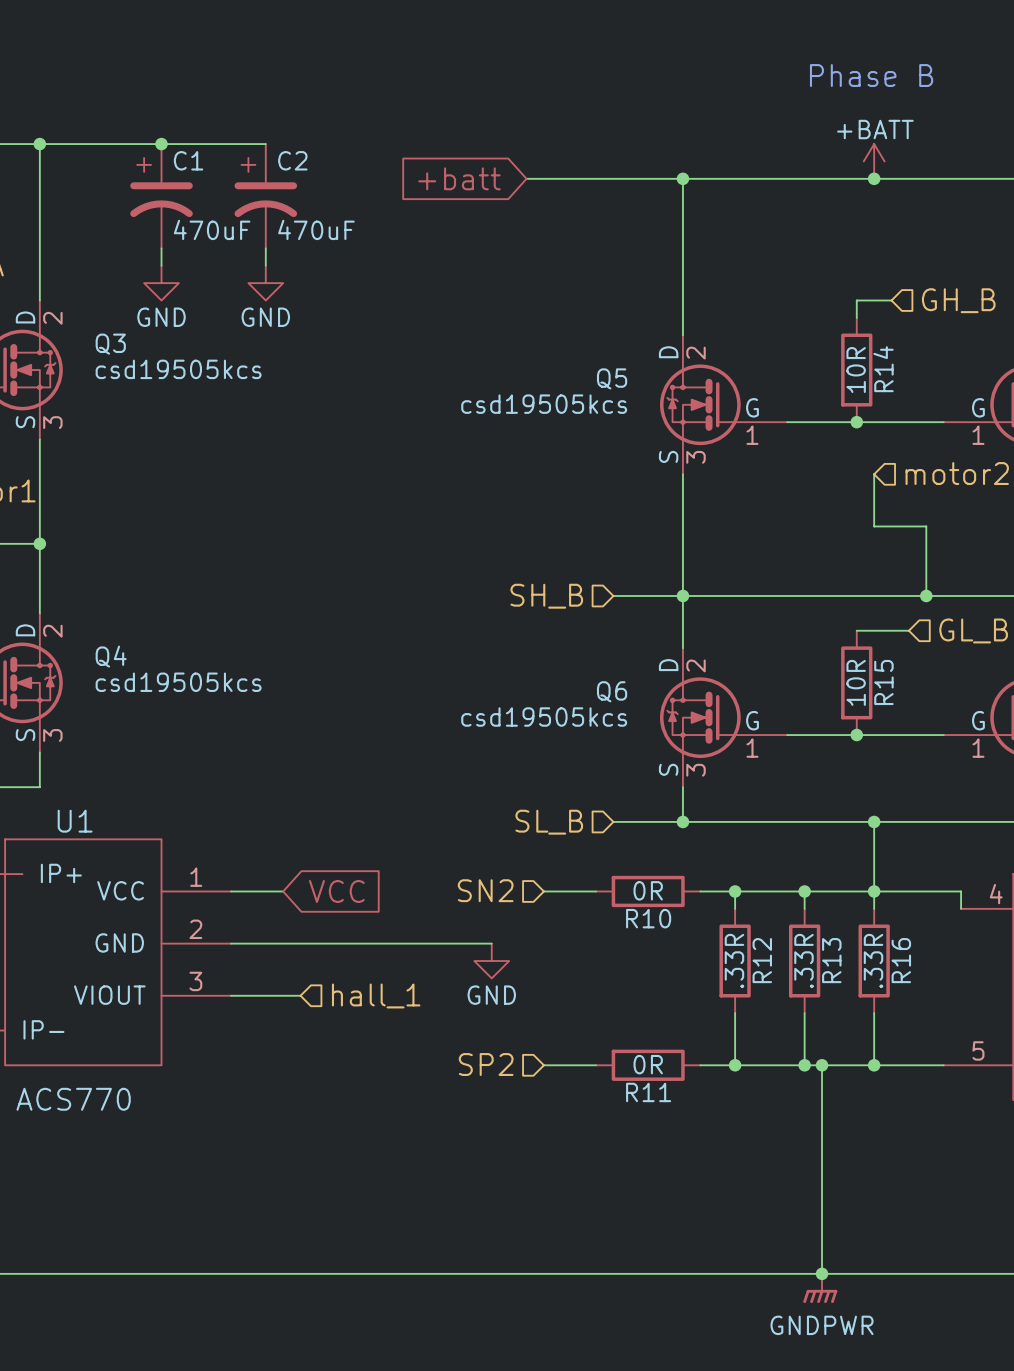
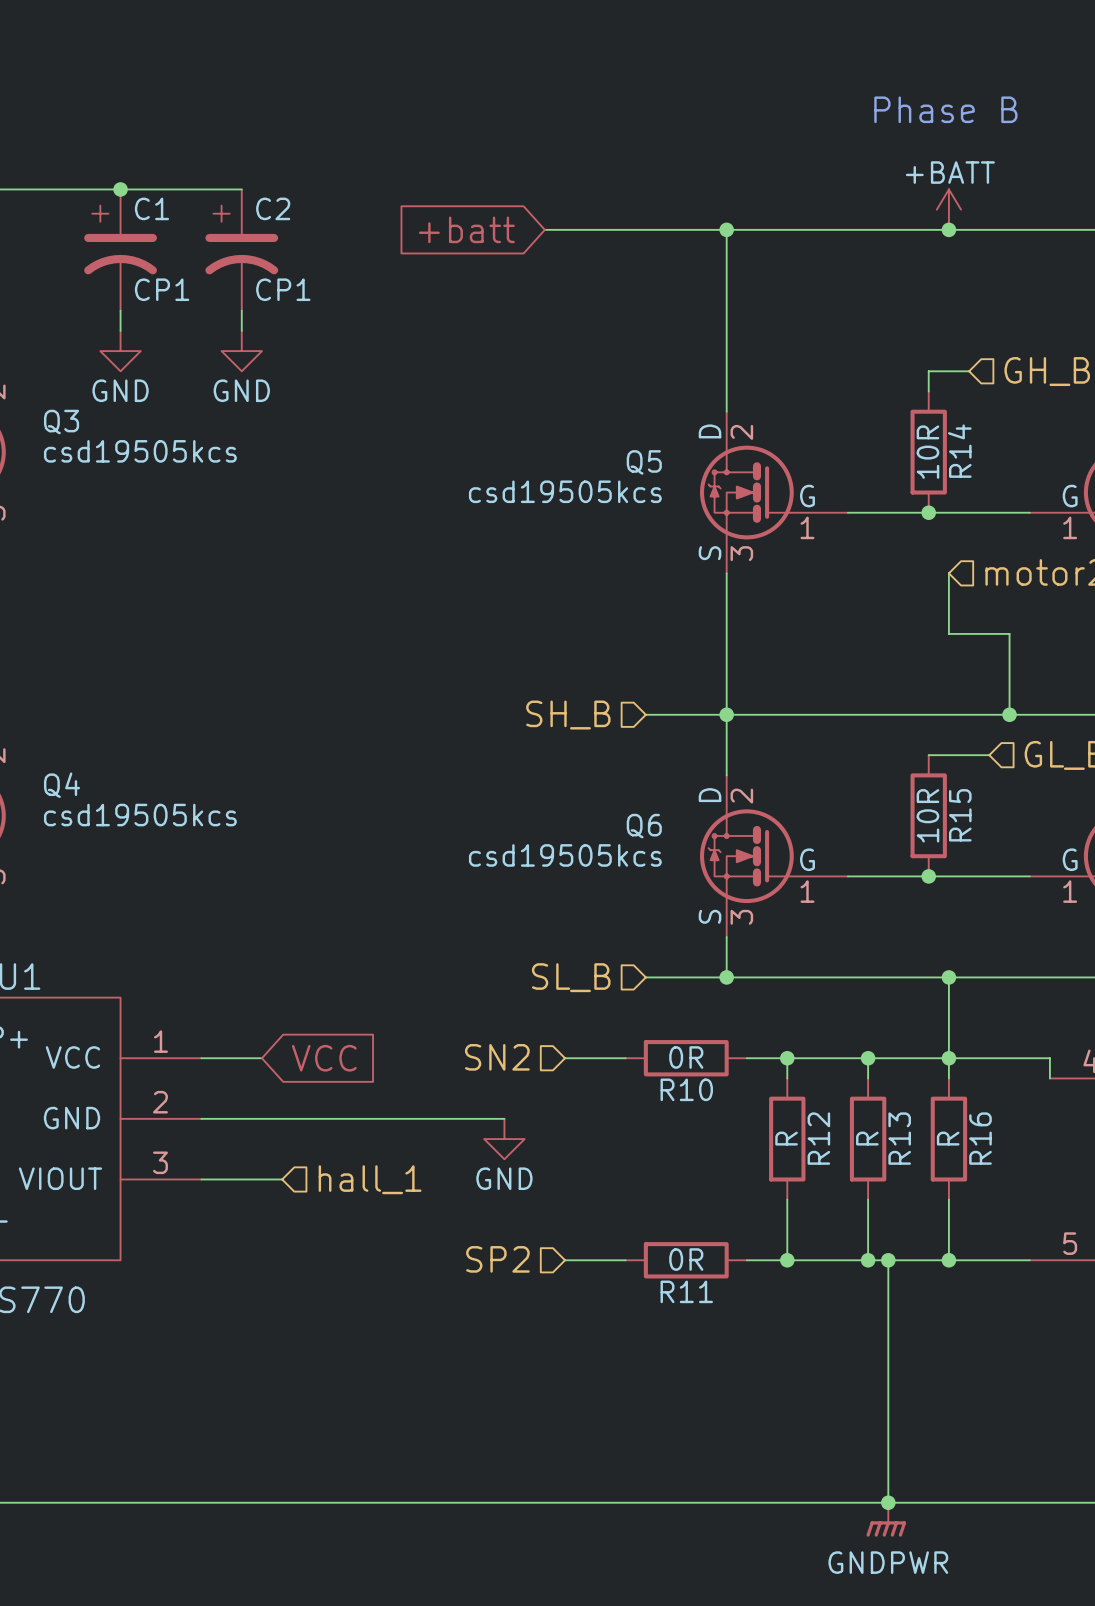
C1 value: 470uF (212, 229) -> CP1 (162, 289)
C2 value: 470uF (316, 229) -> CP1 (283, 289)
R12 value: .33R (734, 961) -> R (786, 1138)
R13 value: .33R (803, 961) -> R (867, 1138)
R16 value: .33R (873, 961) -> R (948, 1138)

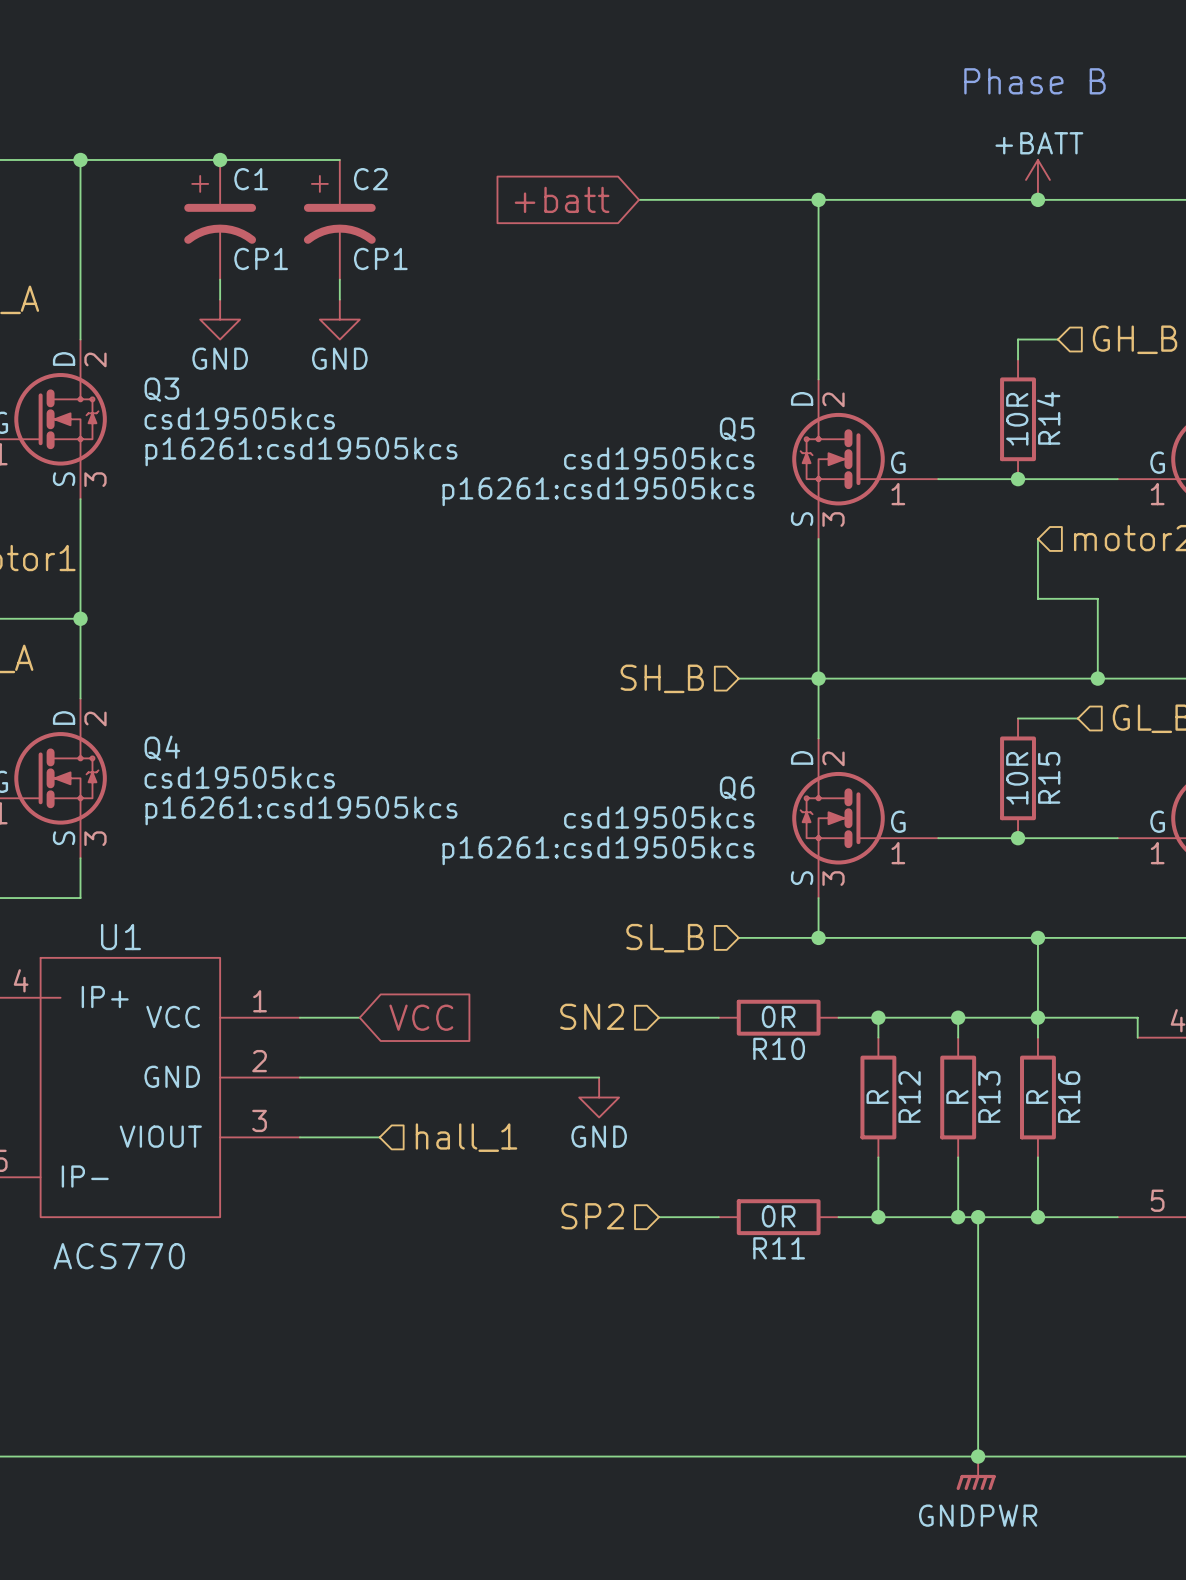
Q3 text: none -> p16261:csd19505kcs (301, 451)
Q5 text: none -> p16261:csd19505kcs (598, 491)
Q4 text: none -> p16261:csd19505kcs (301, 810)
Q6 text: none -> p16261:csd19505kcs (598, 850)

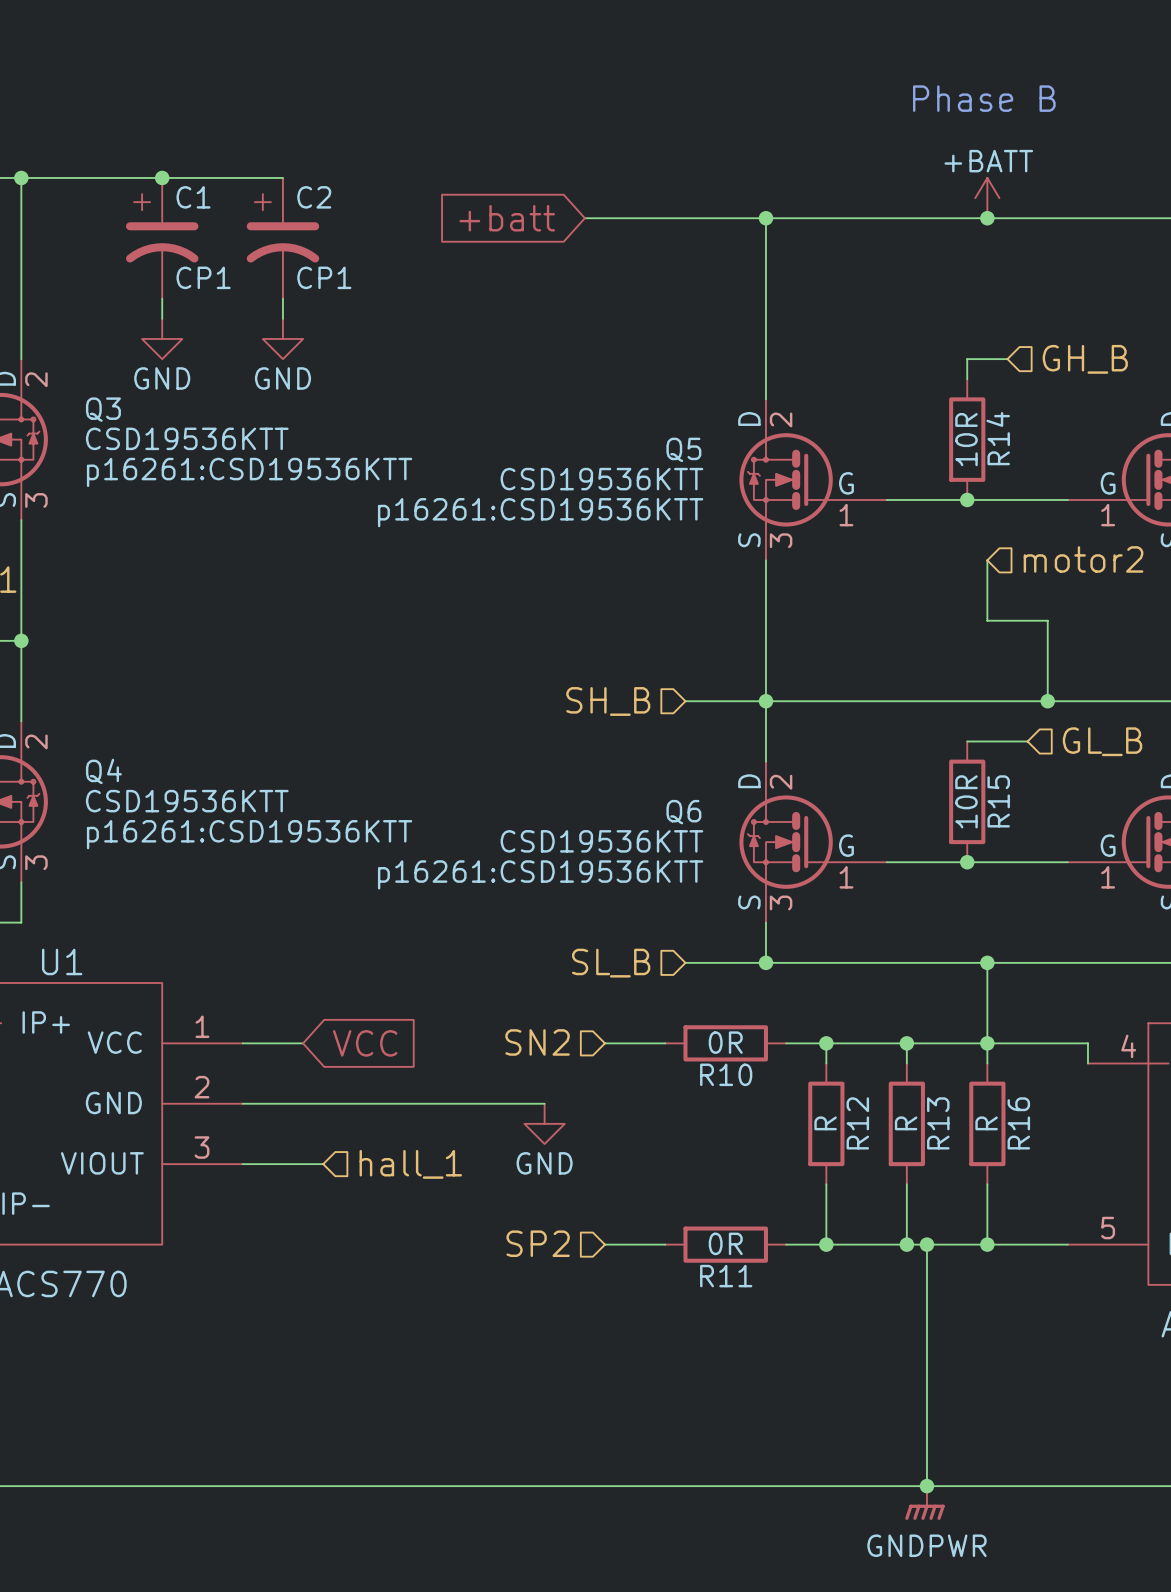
Q3 value: csd19505kcs (239, 418) -> CSD19536KTT (187, 438)
Q3 text: p16261:csd19505kcs (301, 451) -> p16261:CSD19536KTT (249, 472)
Q5 value: csd19505kcs (659, 458) -> CSD19536KTT (601, 479)
Q5 text: p16261:csd19505kcs (598, 491) -> p16261:CSD19536KTT (540, 512)
Q4 value: csd19505kcs (239, 777) -> CSD19536KTT (187, 801)
Q4 text: p16261:csd19505kcs (301, 810) -> p16261:CSD19536KTT (249, 834)
Q6 value: csd19505kcs (659, 817) -> CSD19536KTT (601, 841)
Q6 text: p16261:csd19505kcs (598, 850) -> p16261:CSD19536KTT (540, 874)

